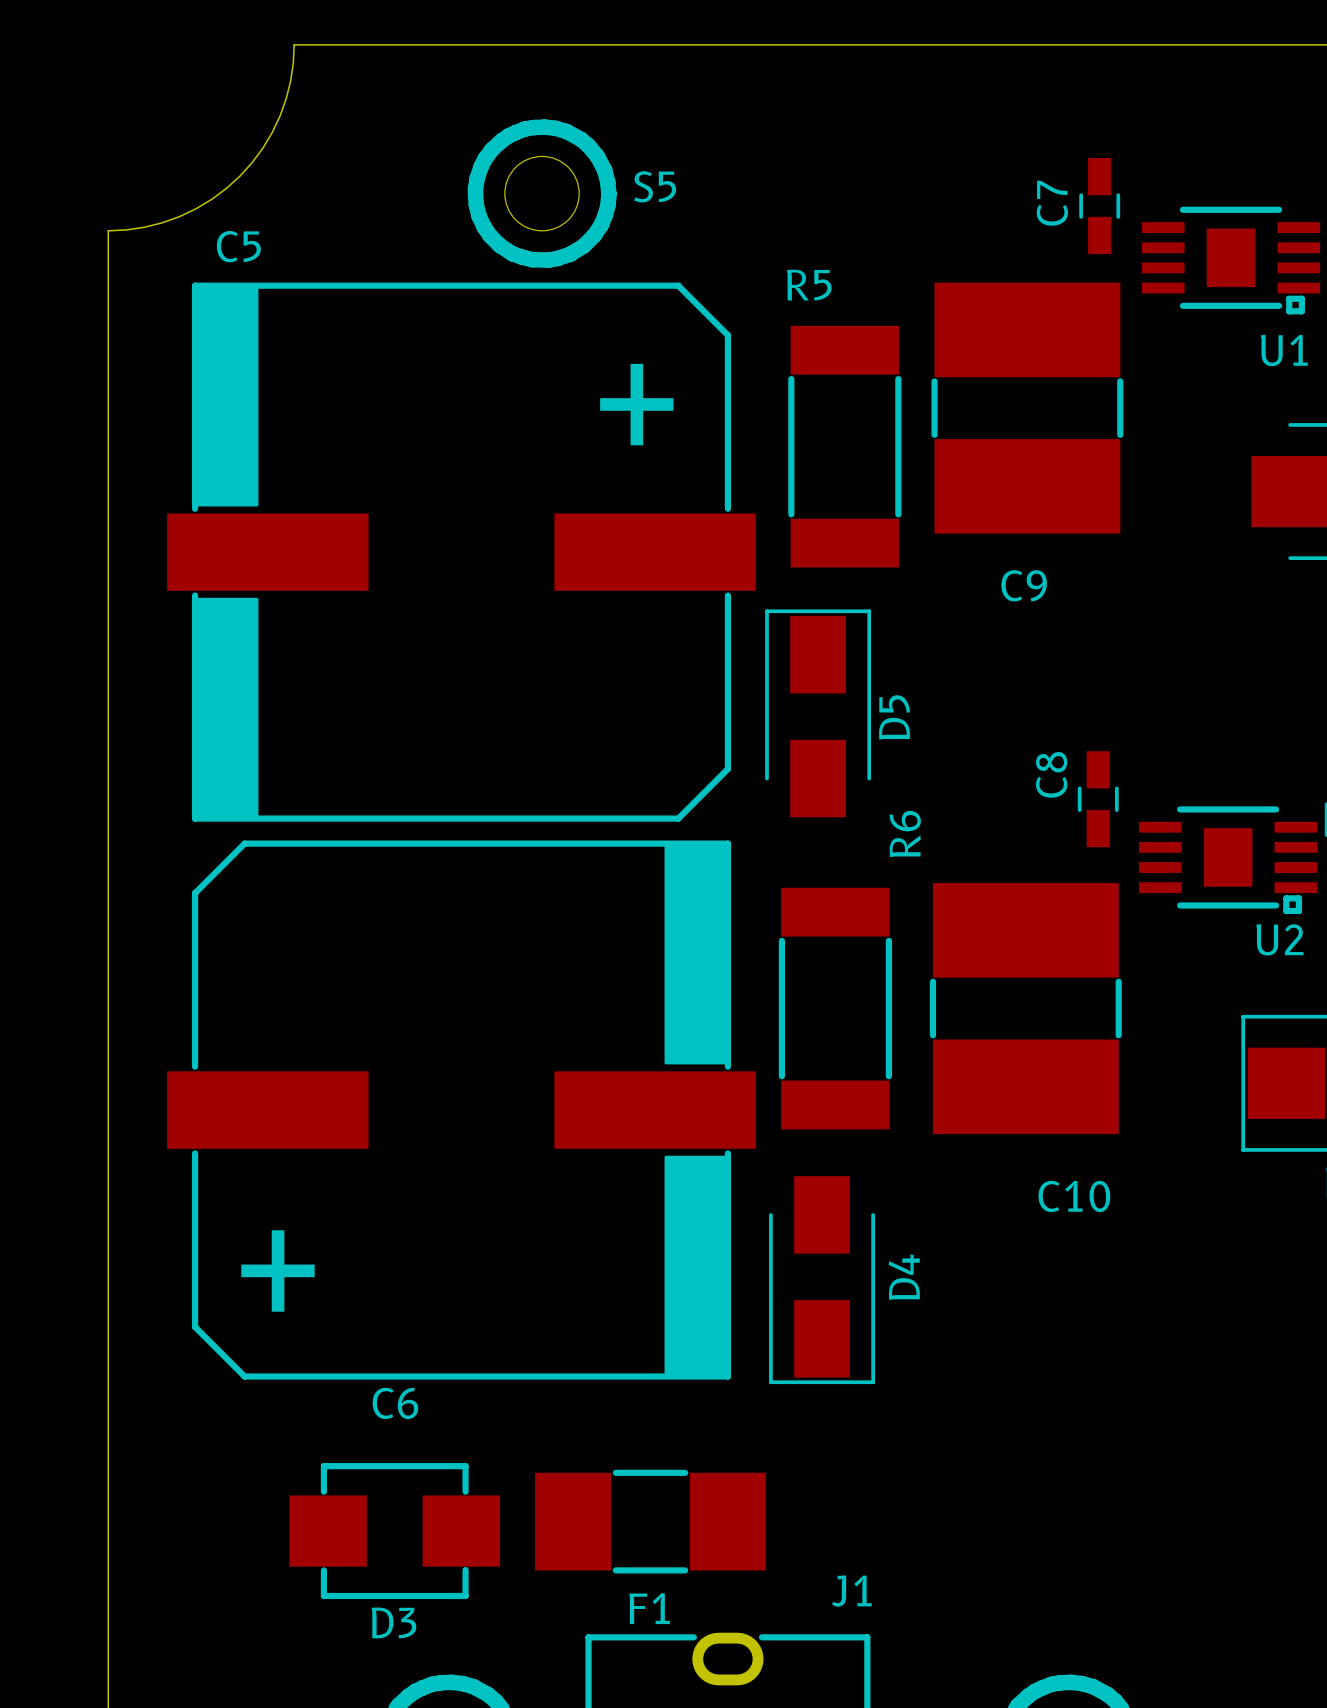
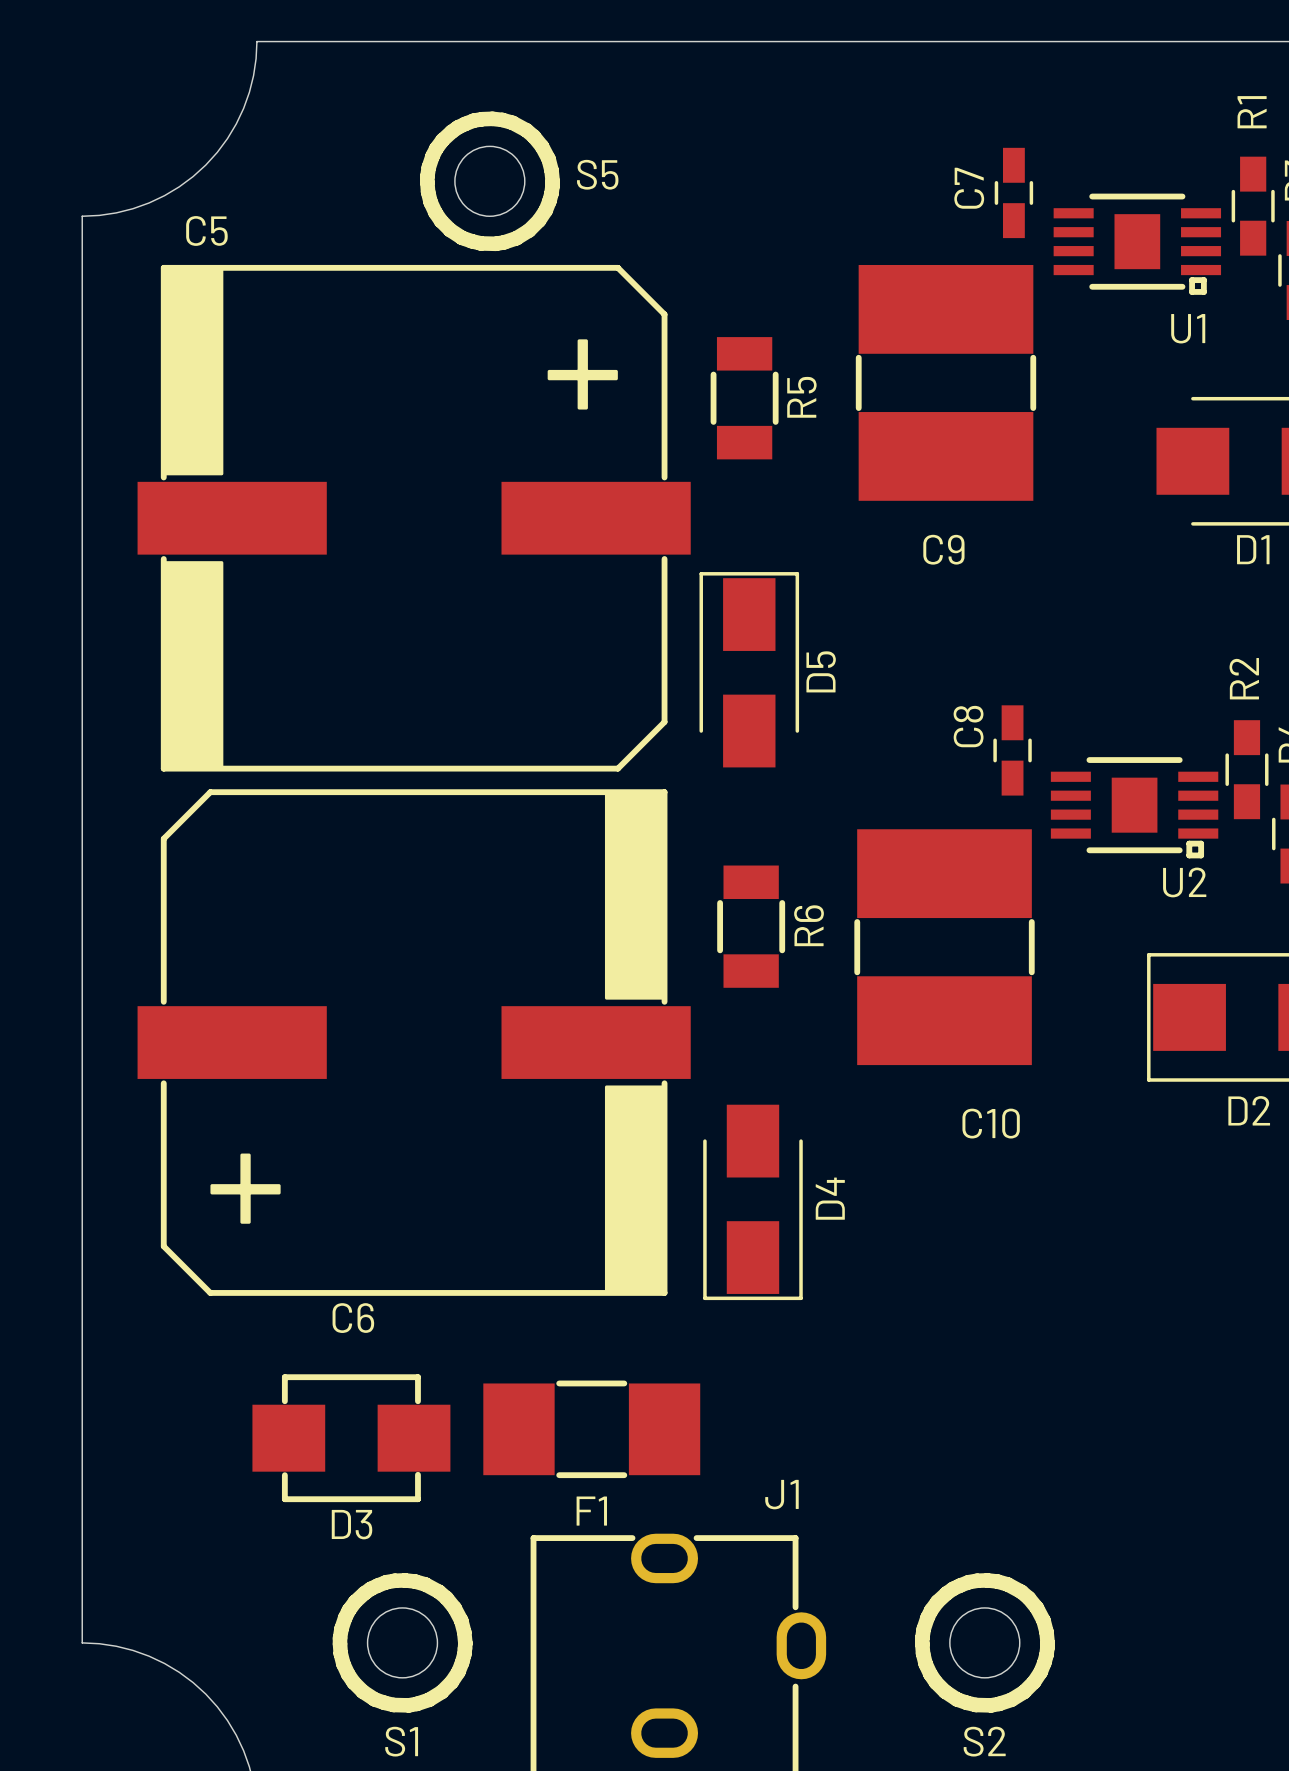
R5 name position: R5 (809, 285) -> R5 (801, 397)
R5 footprint: [788, 325, 902, 568] -> [710, 337, 779, 460]
R6 name position: R6 (905, 834) -> R6 (809, 925)
R6 footprint: [778, 887, 893, 1130] -> [717, 865, 786, 988]

